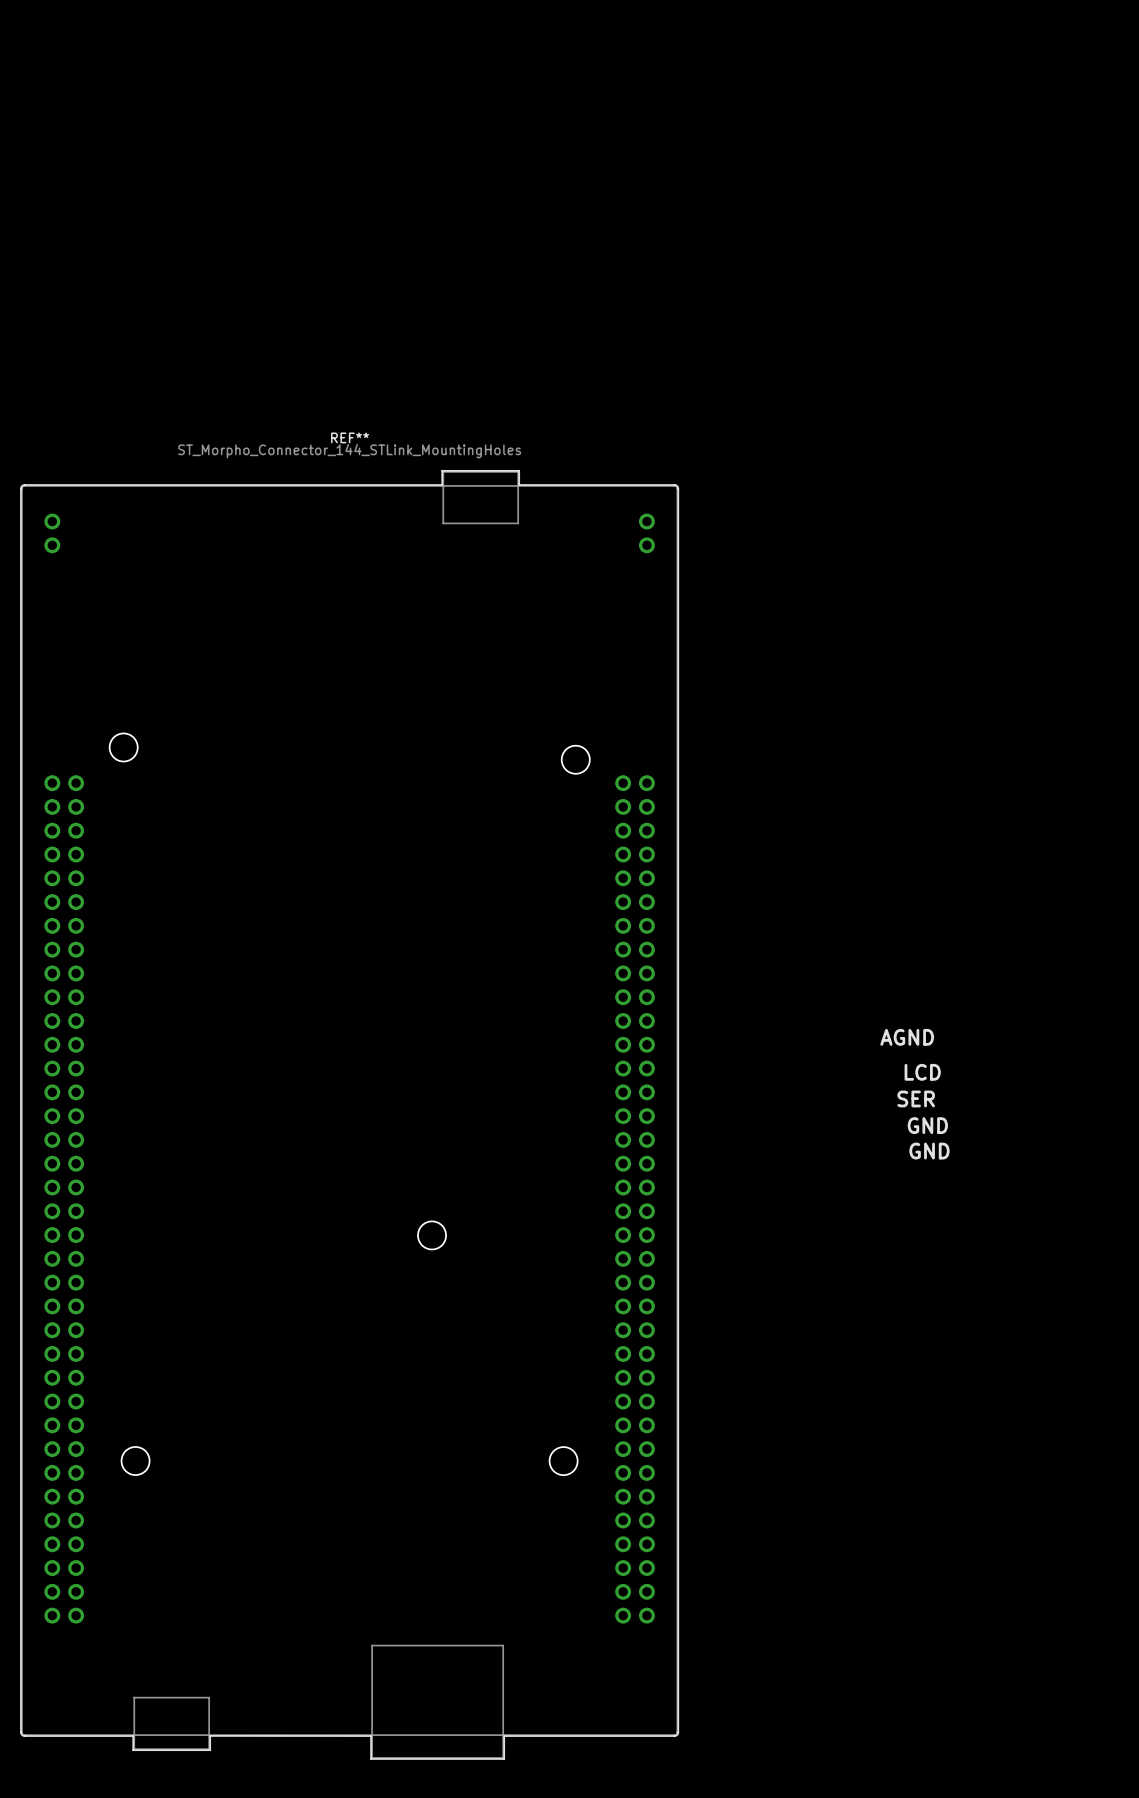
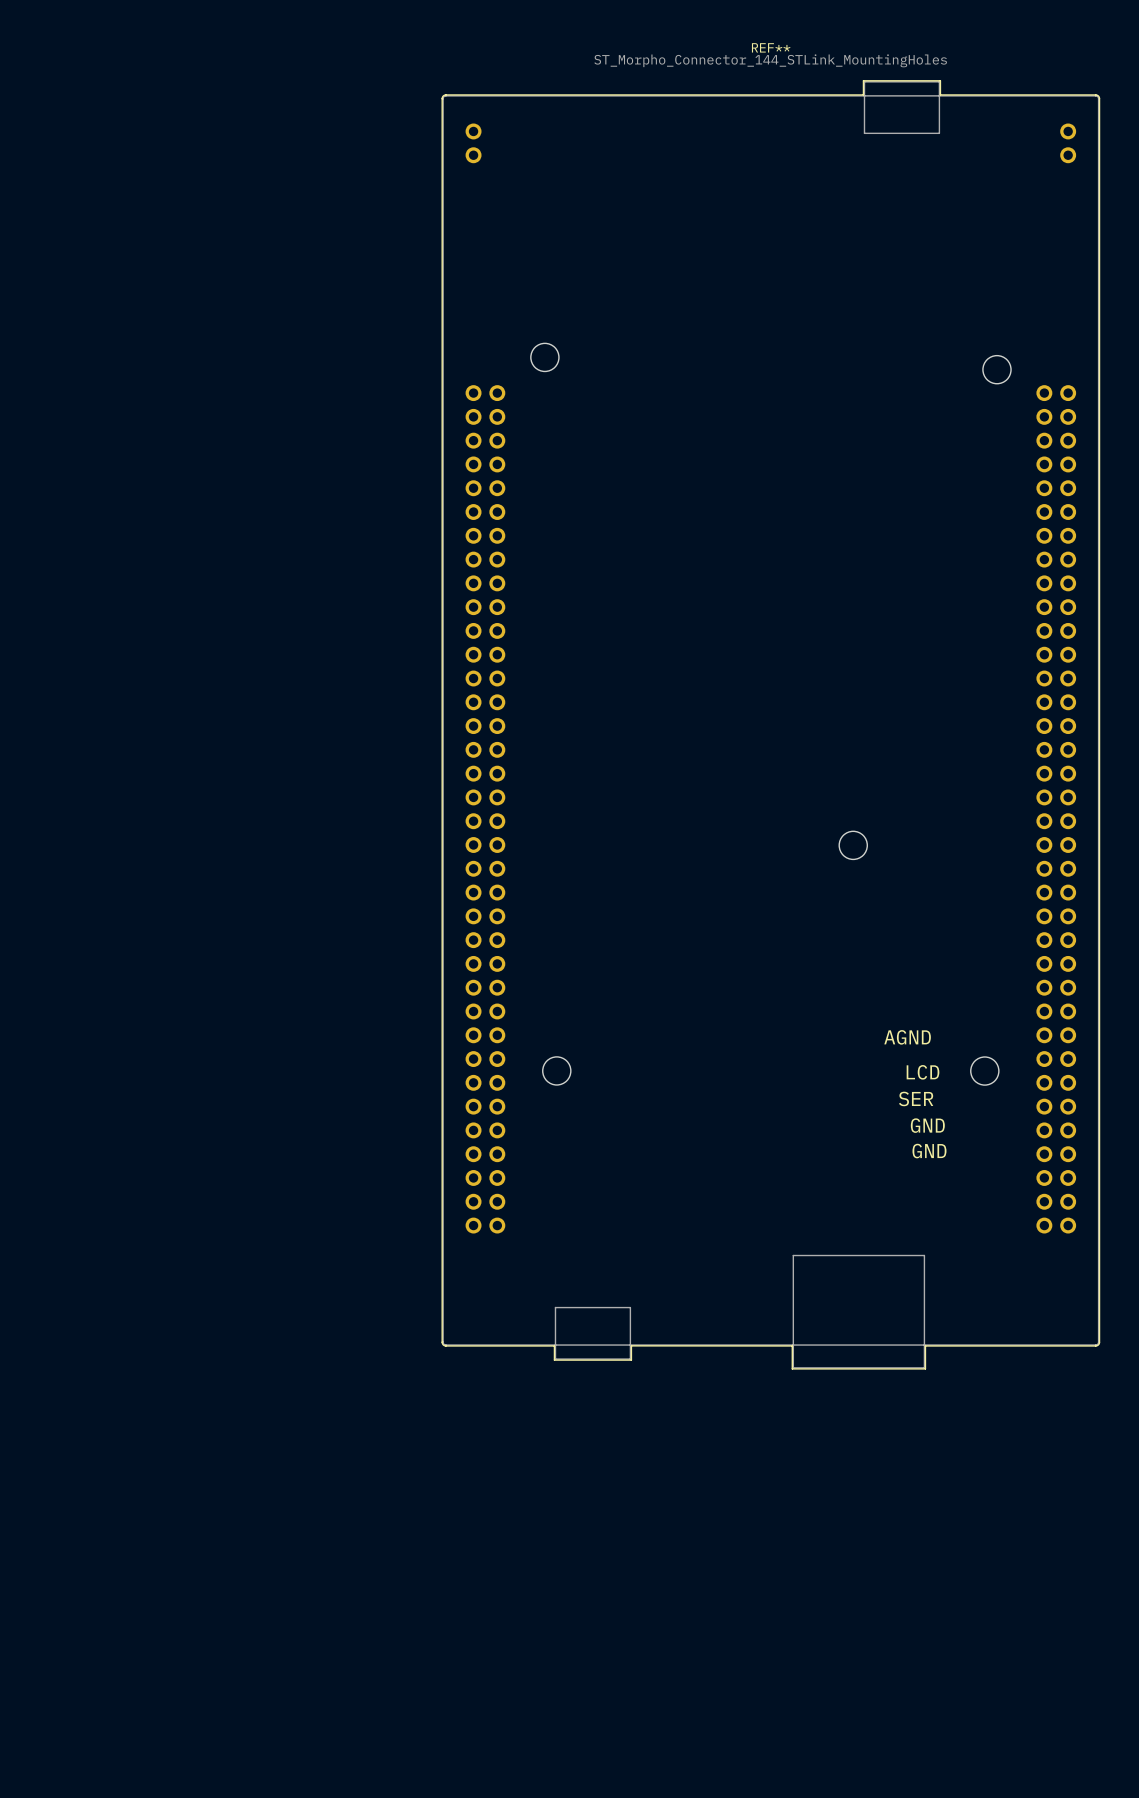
REF**: none -> ST_Morpho_Connector_144_STLink_MountingHoles (770, 724)
REF**: ST_Morpho_Connector_144_STLink_MountingHoles (349, 1114) -> none

